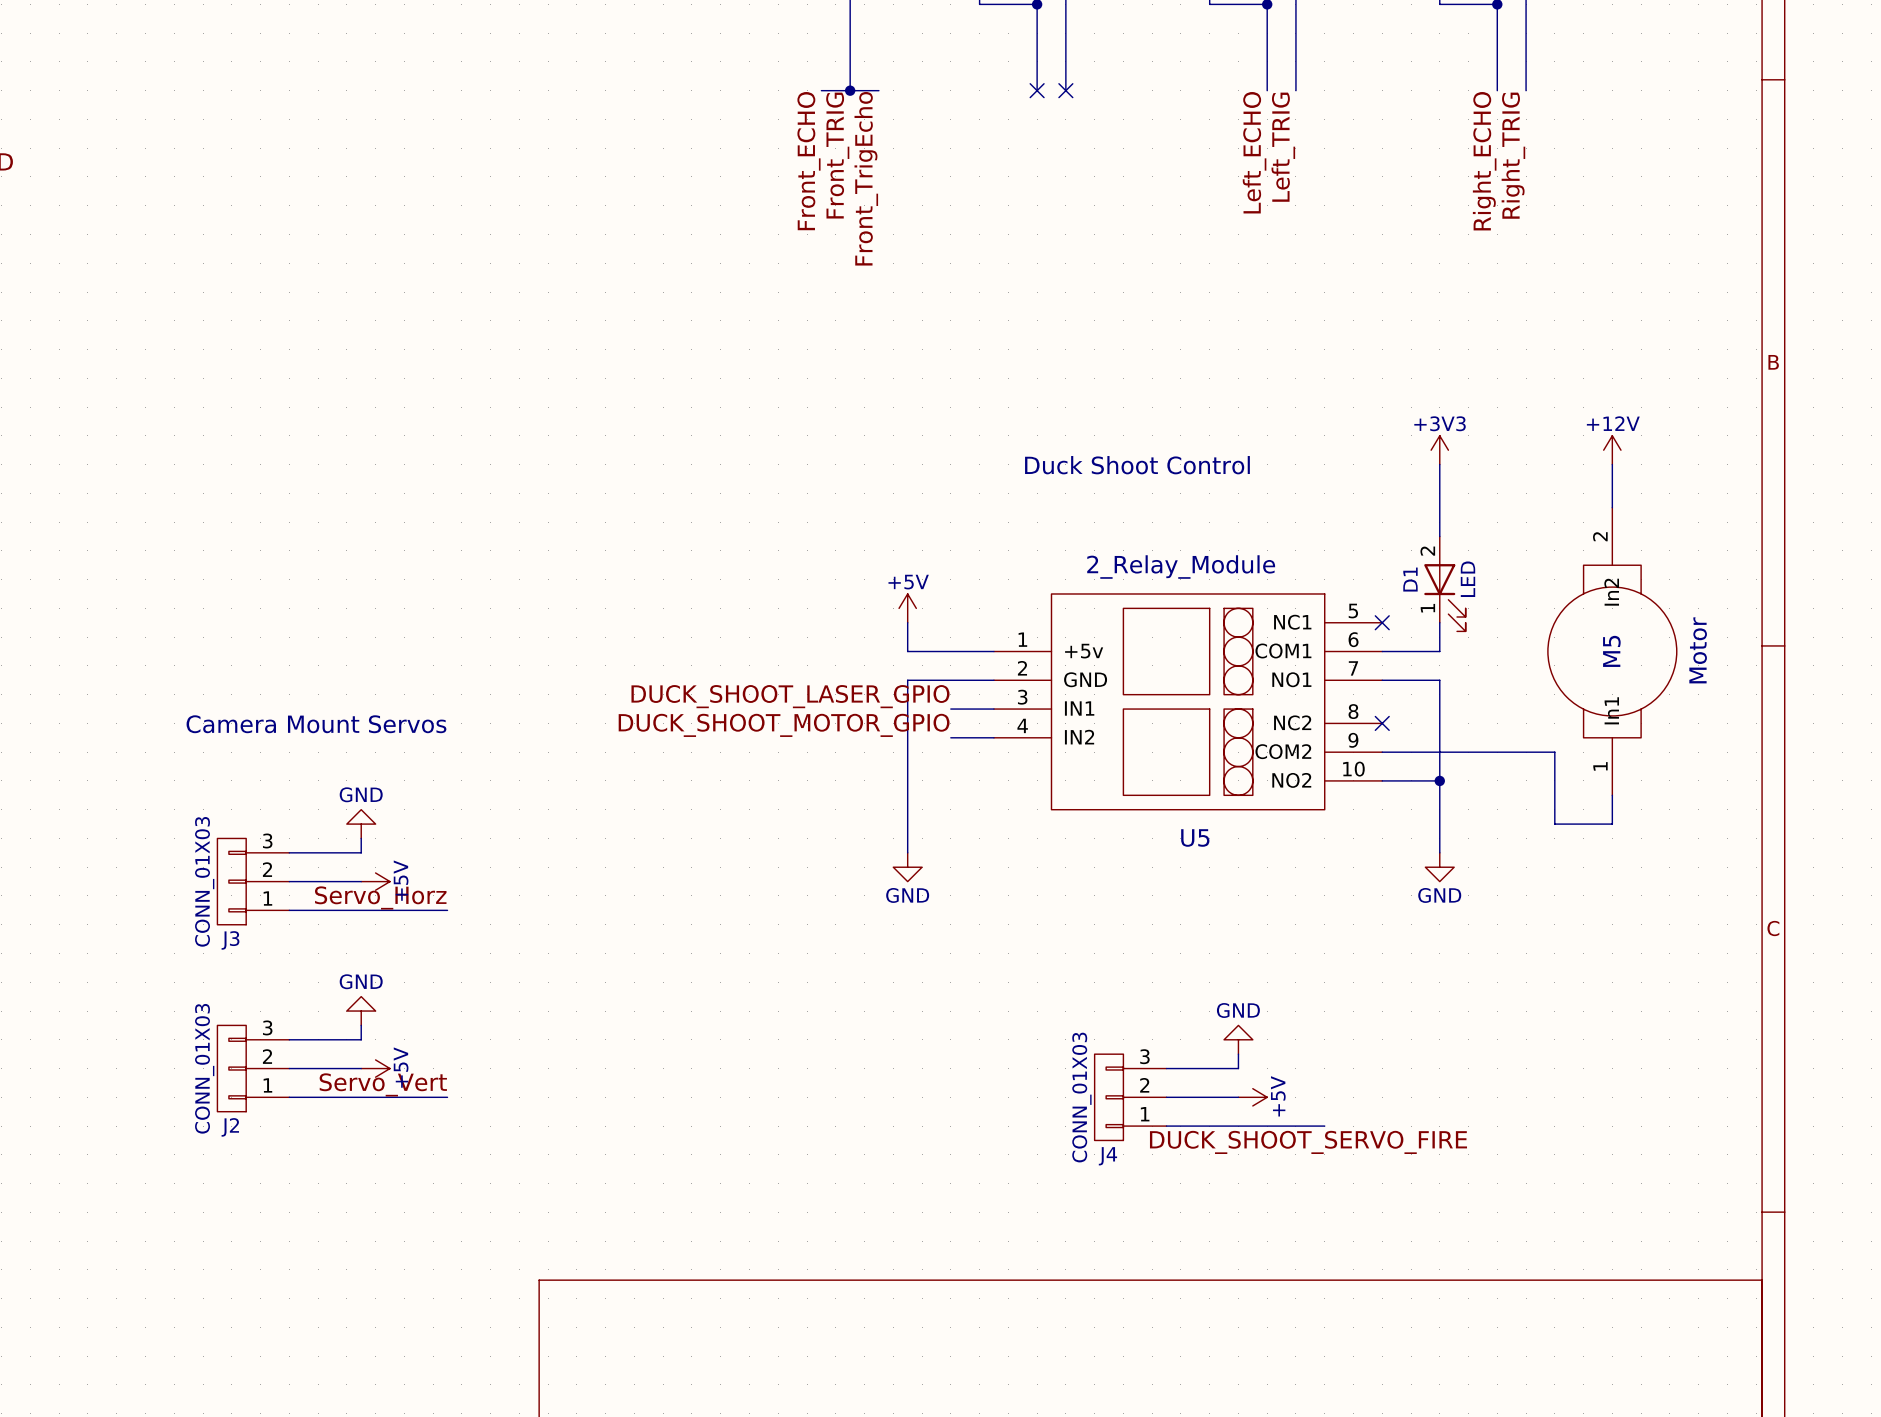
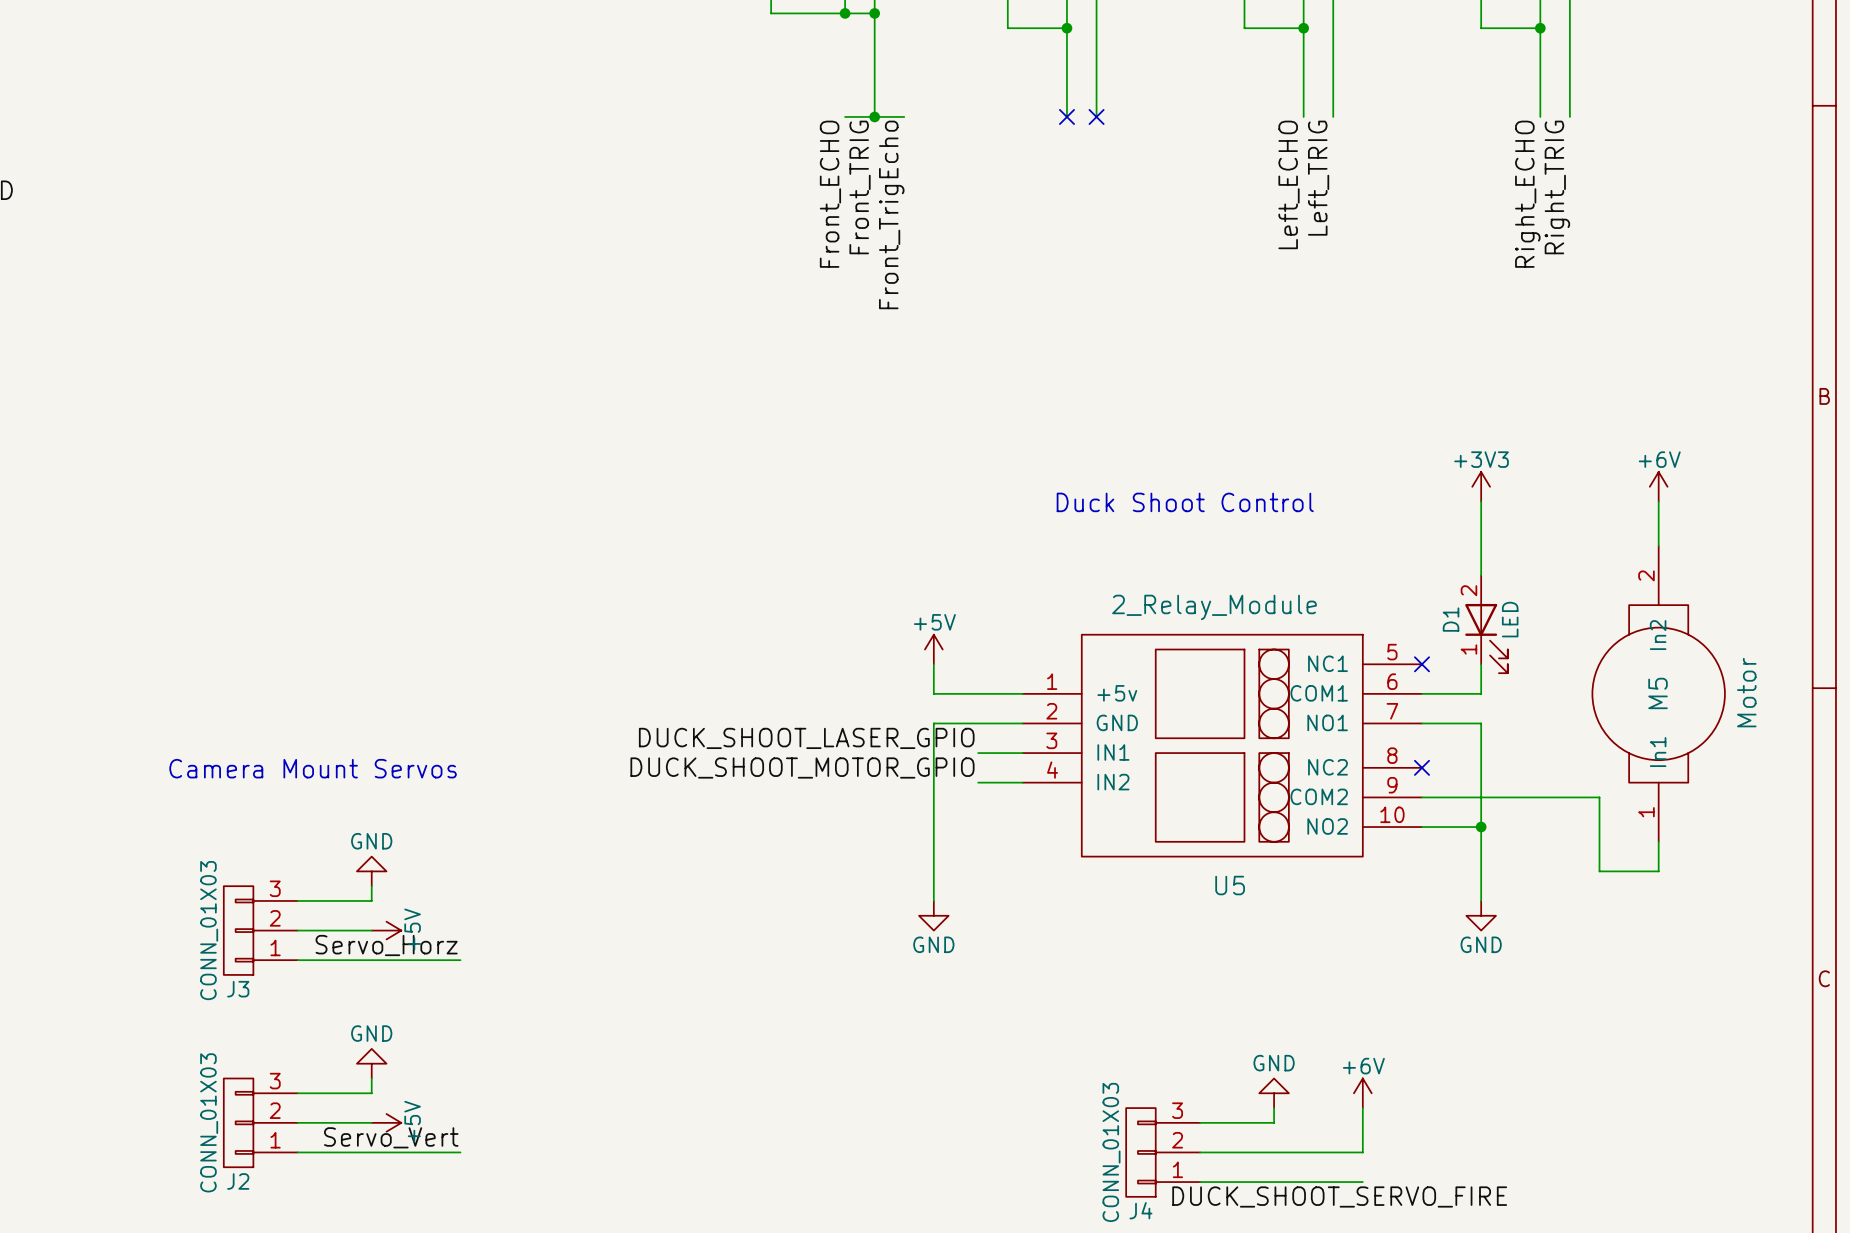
power symbol: +12V (1612, 450) -> +6V (1658, 486)
power symbol: none -> +6V (1362, 1093)
wire: none -> (1362, 1108) (1362, 1152) (1274, 1152)
power symbol: +5V (1252, 1097) -> none

